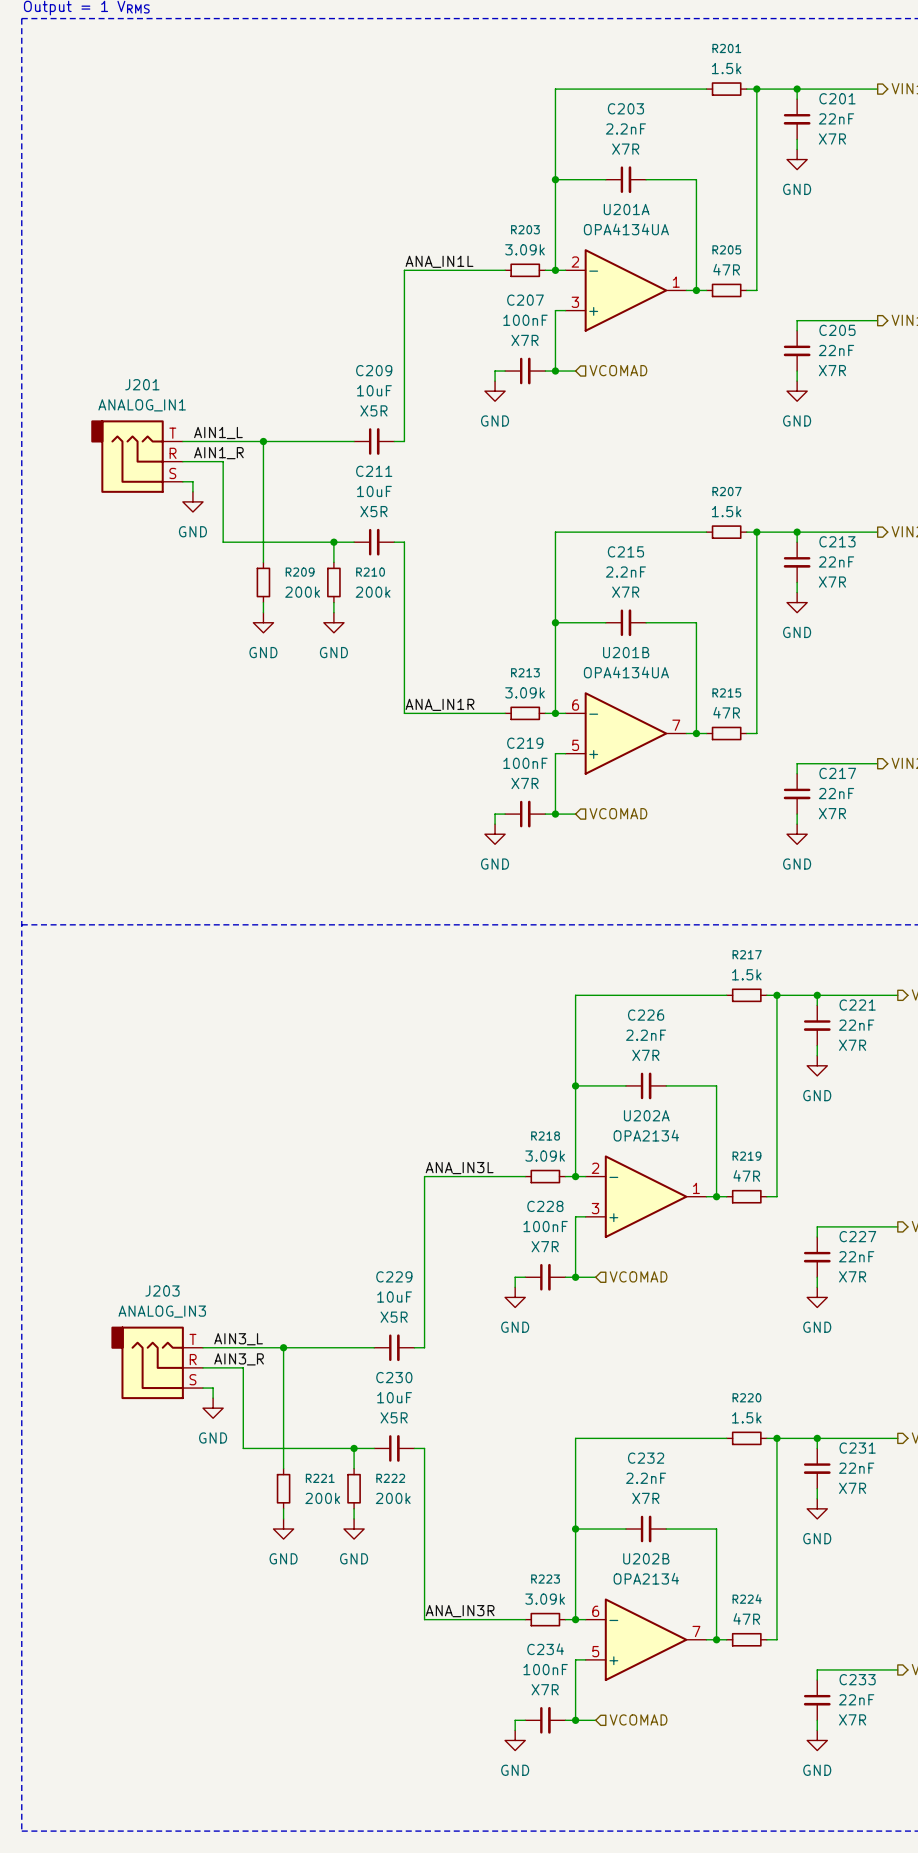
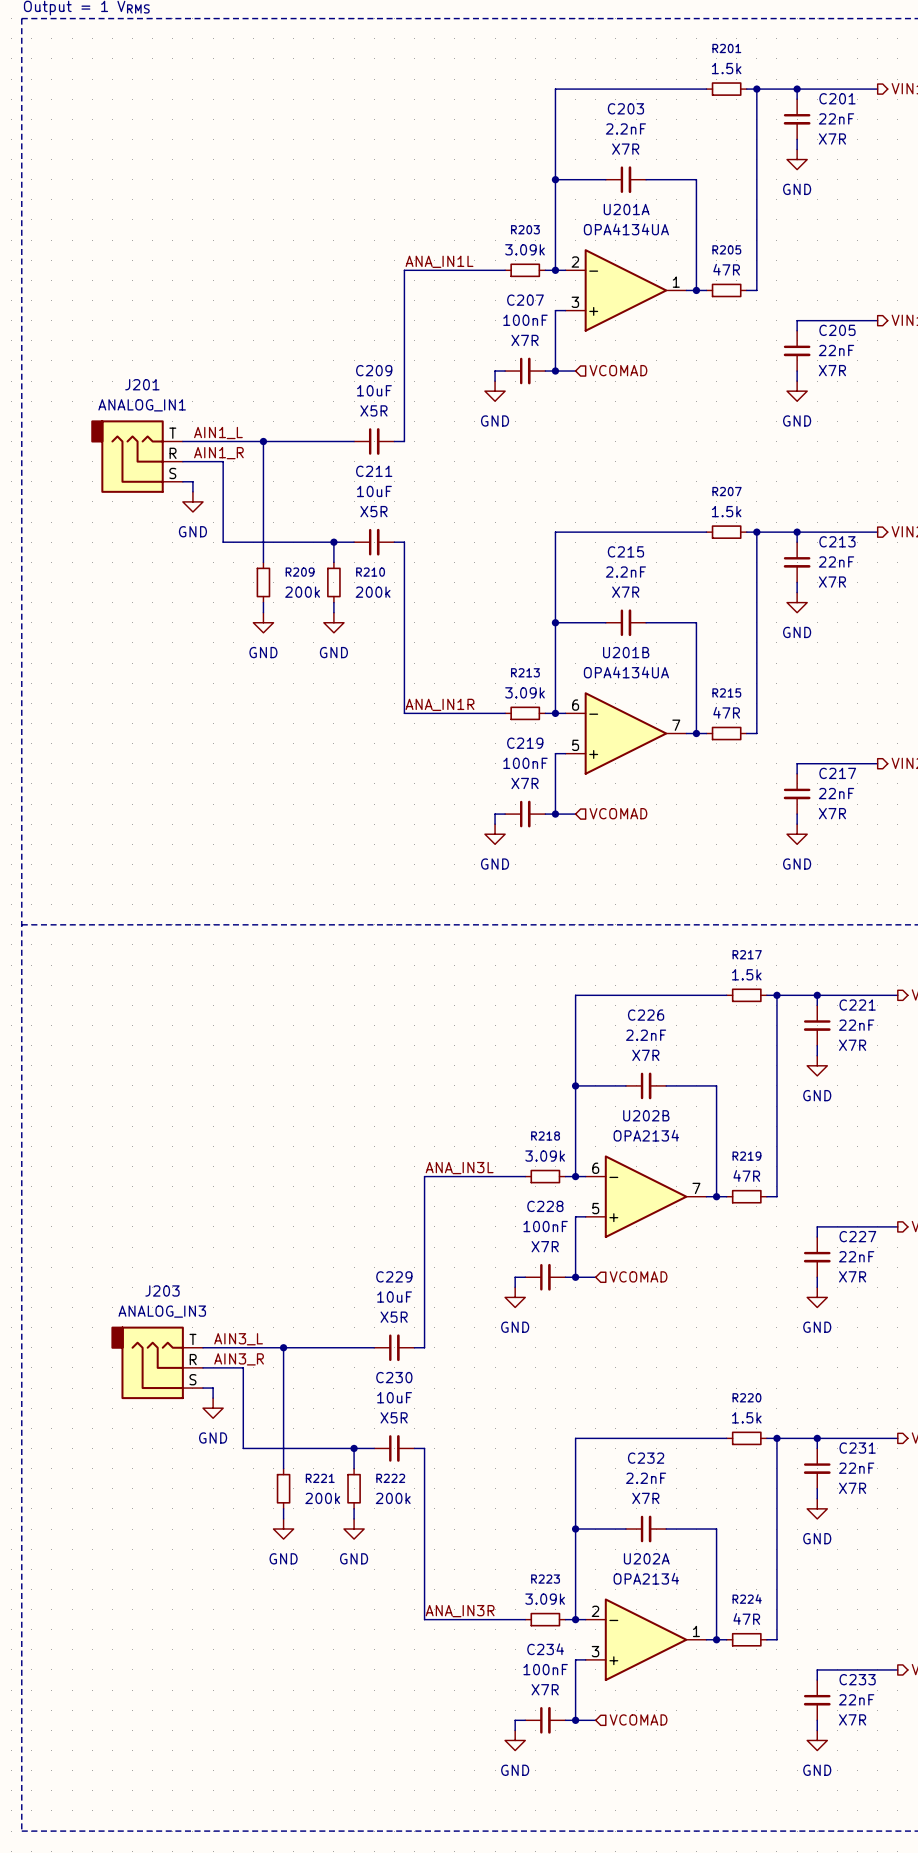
U202A position: (646, 1196) -> (646, 1639)
U202B position: (646, 1639) -> (646, 1196)

